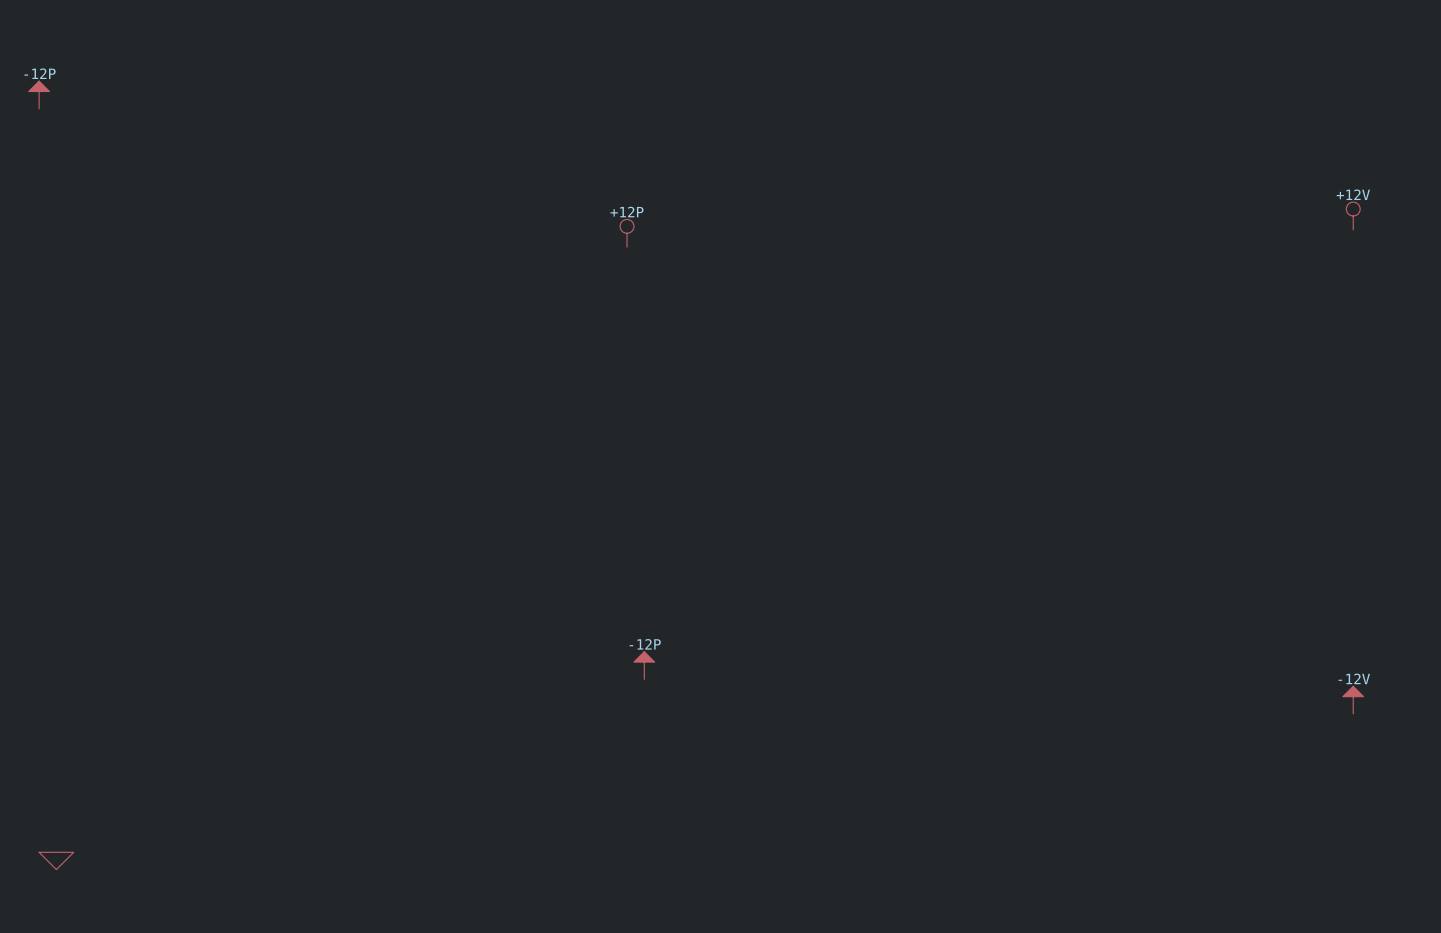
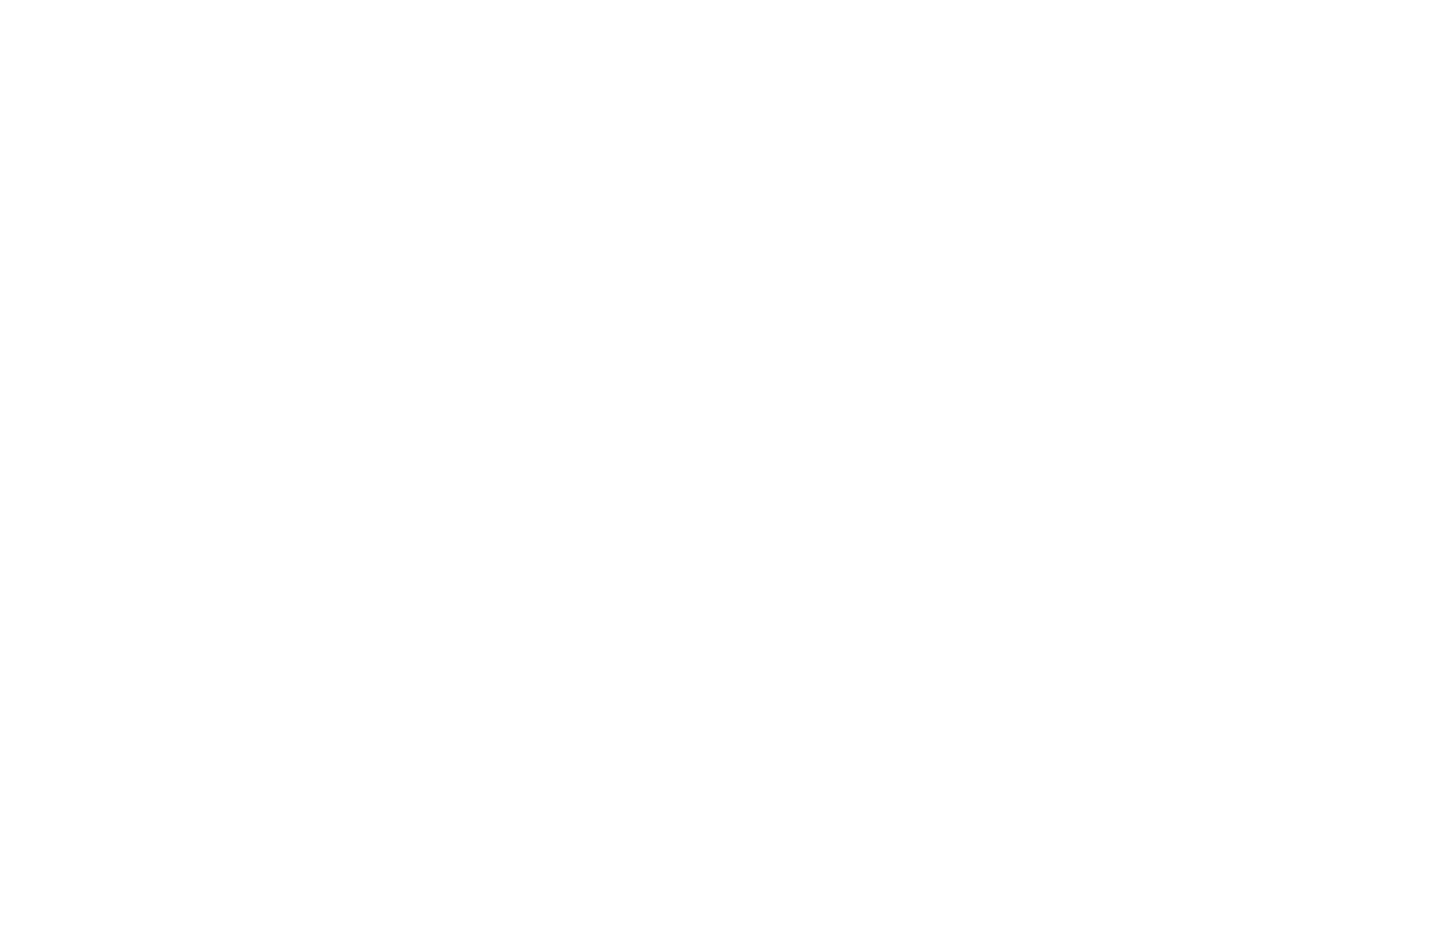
power symbol: -12P (39, 94) -> none
power symbol: +12V (1353, 215) -> none
power symbol: +12P (627, 233) -> none
power symbol: -12P (644, 665) -> none
power symbol: -12V (1353, 700) -> none
power symbol: (56, 860) -> none

